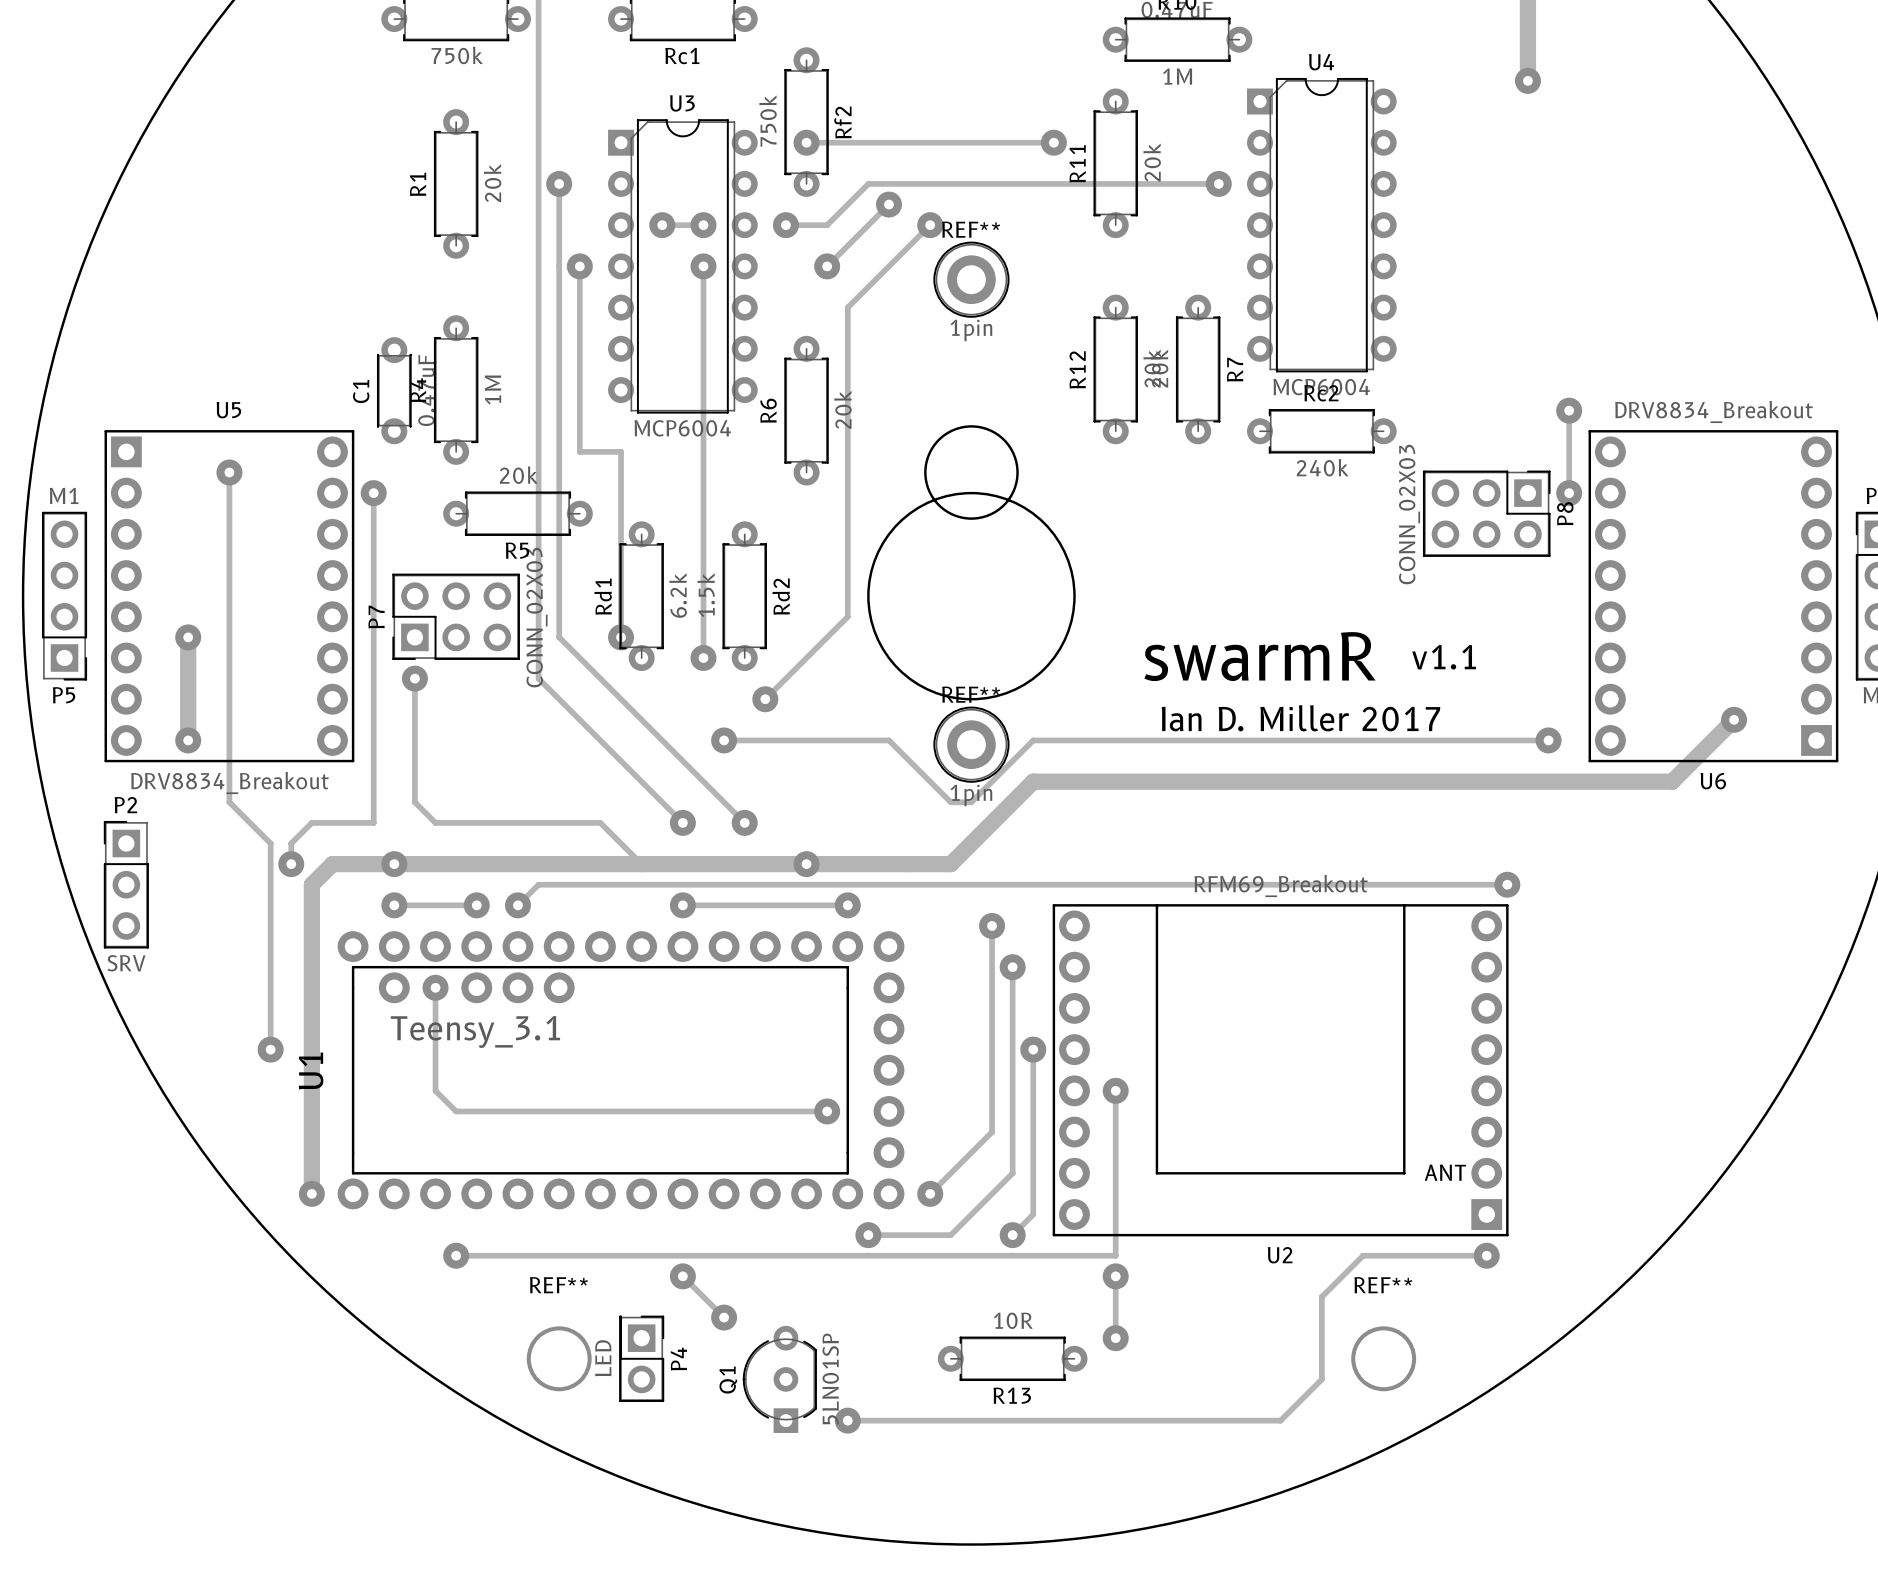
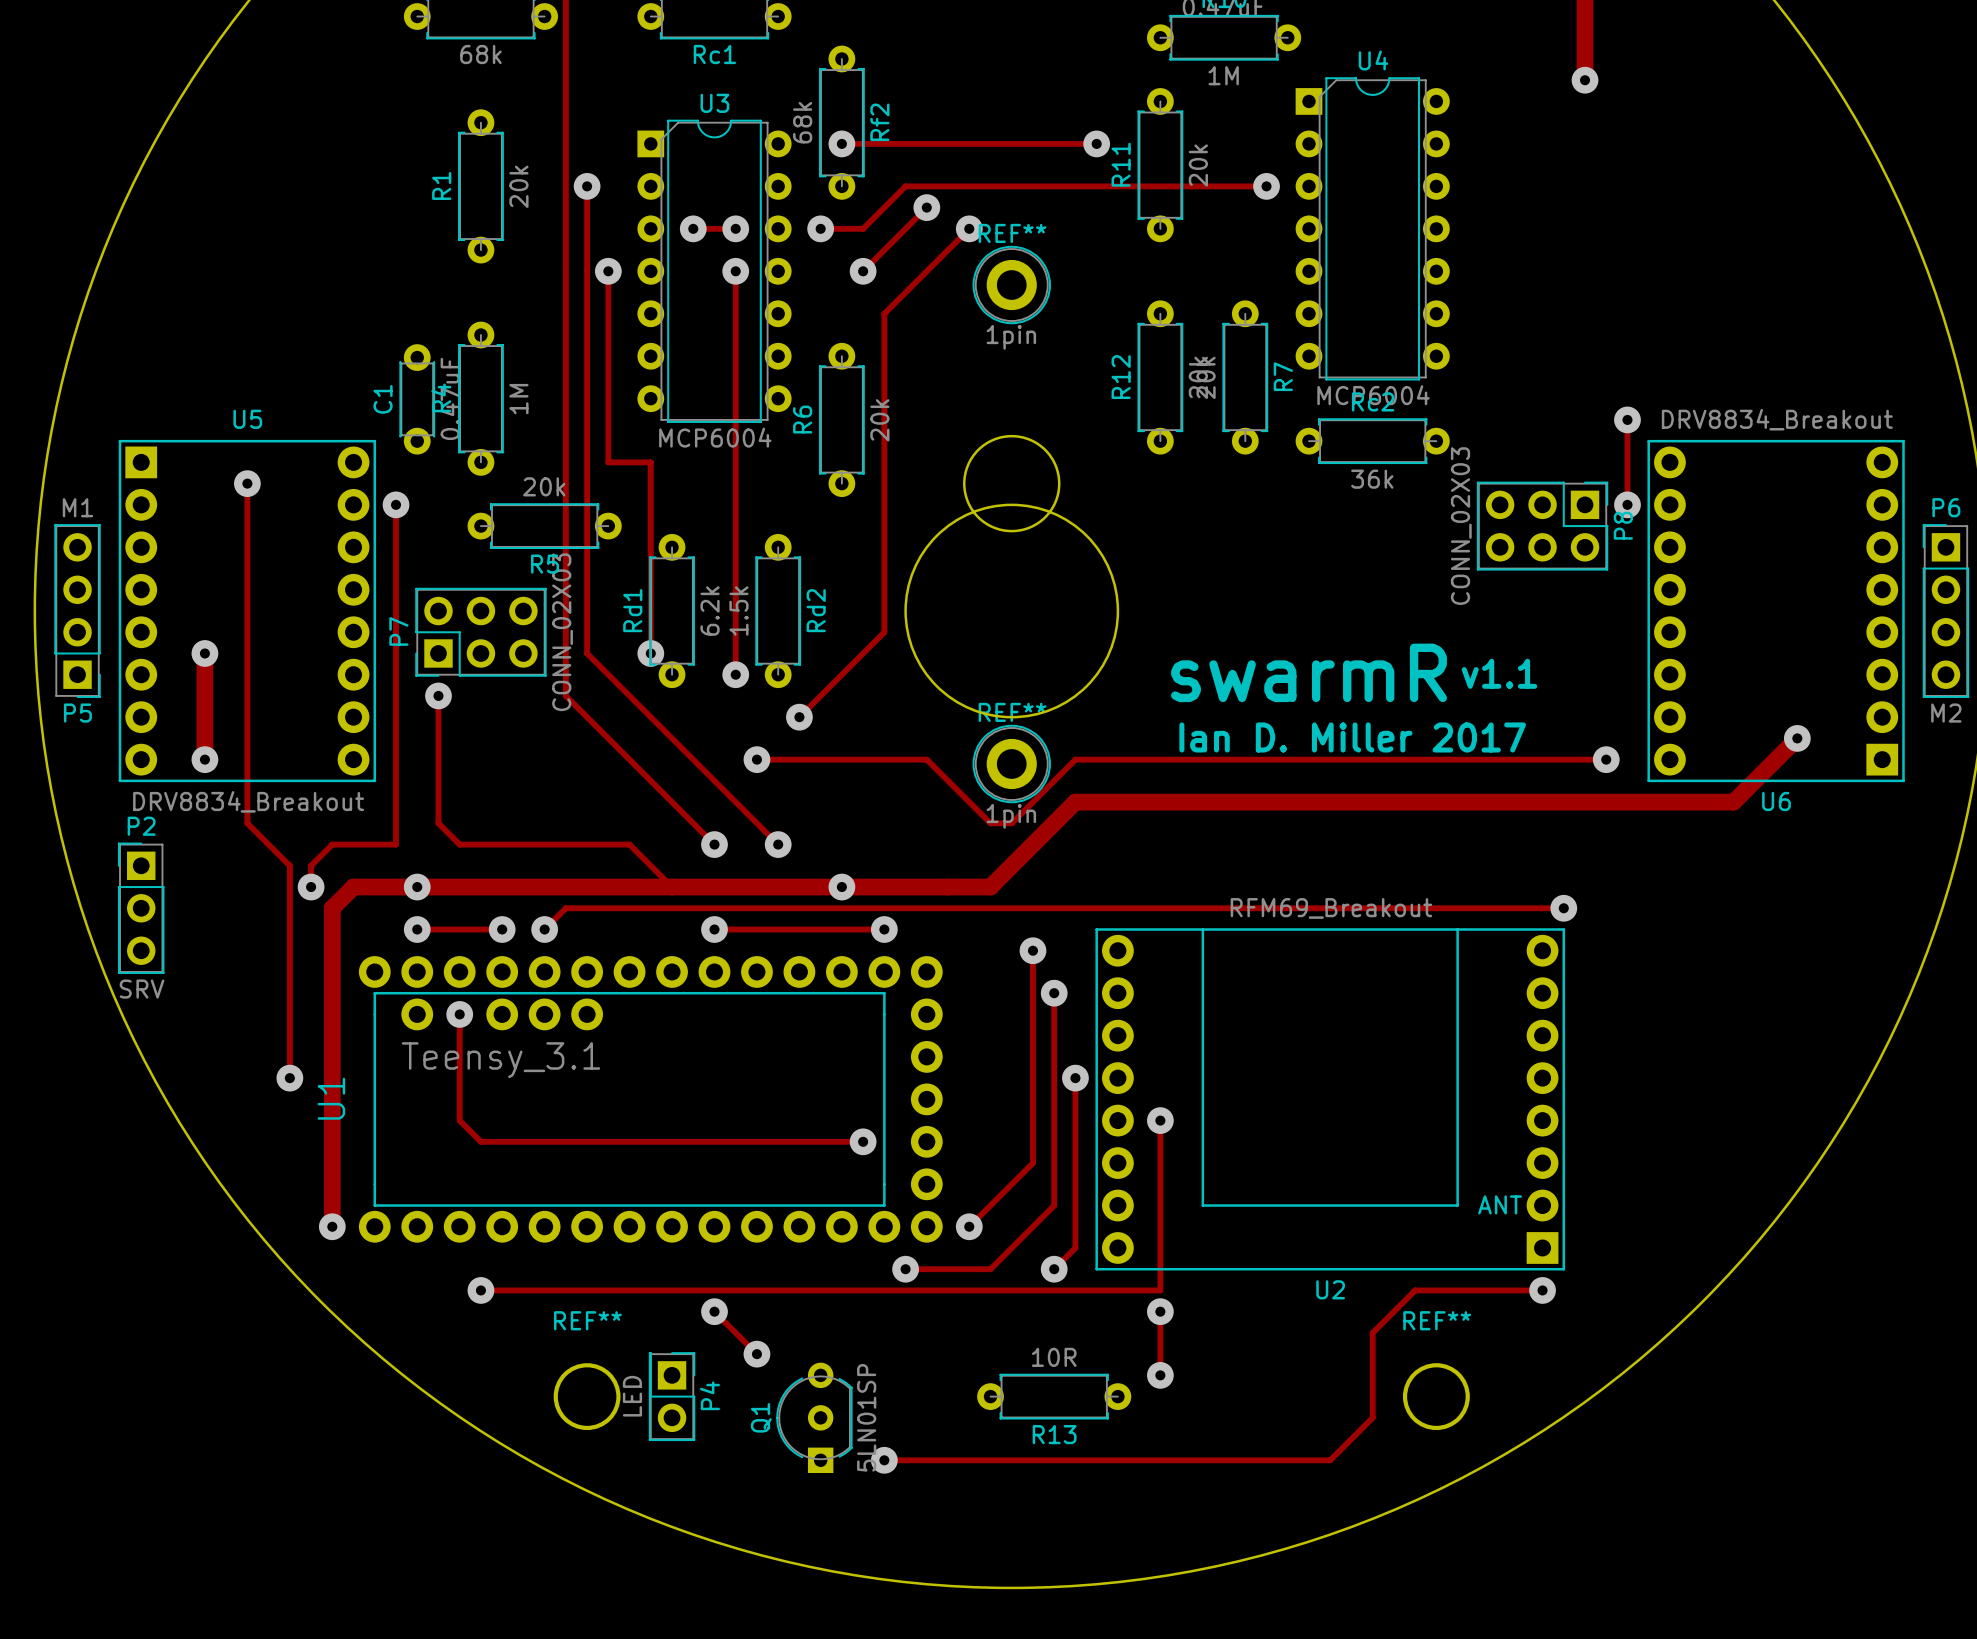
part value: 750k (457, 55) -> 68k (480, 54)
Rf2 value: 750k (768, 121) -> 68k (802, 122)
Rc2 value: 240k (1322, 467) -> 36k (1372, 479)

